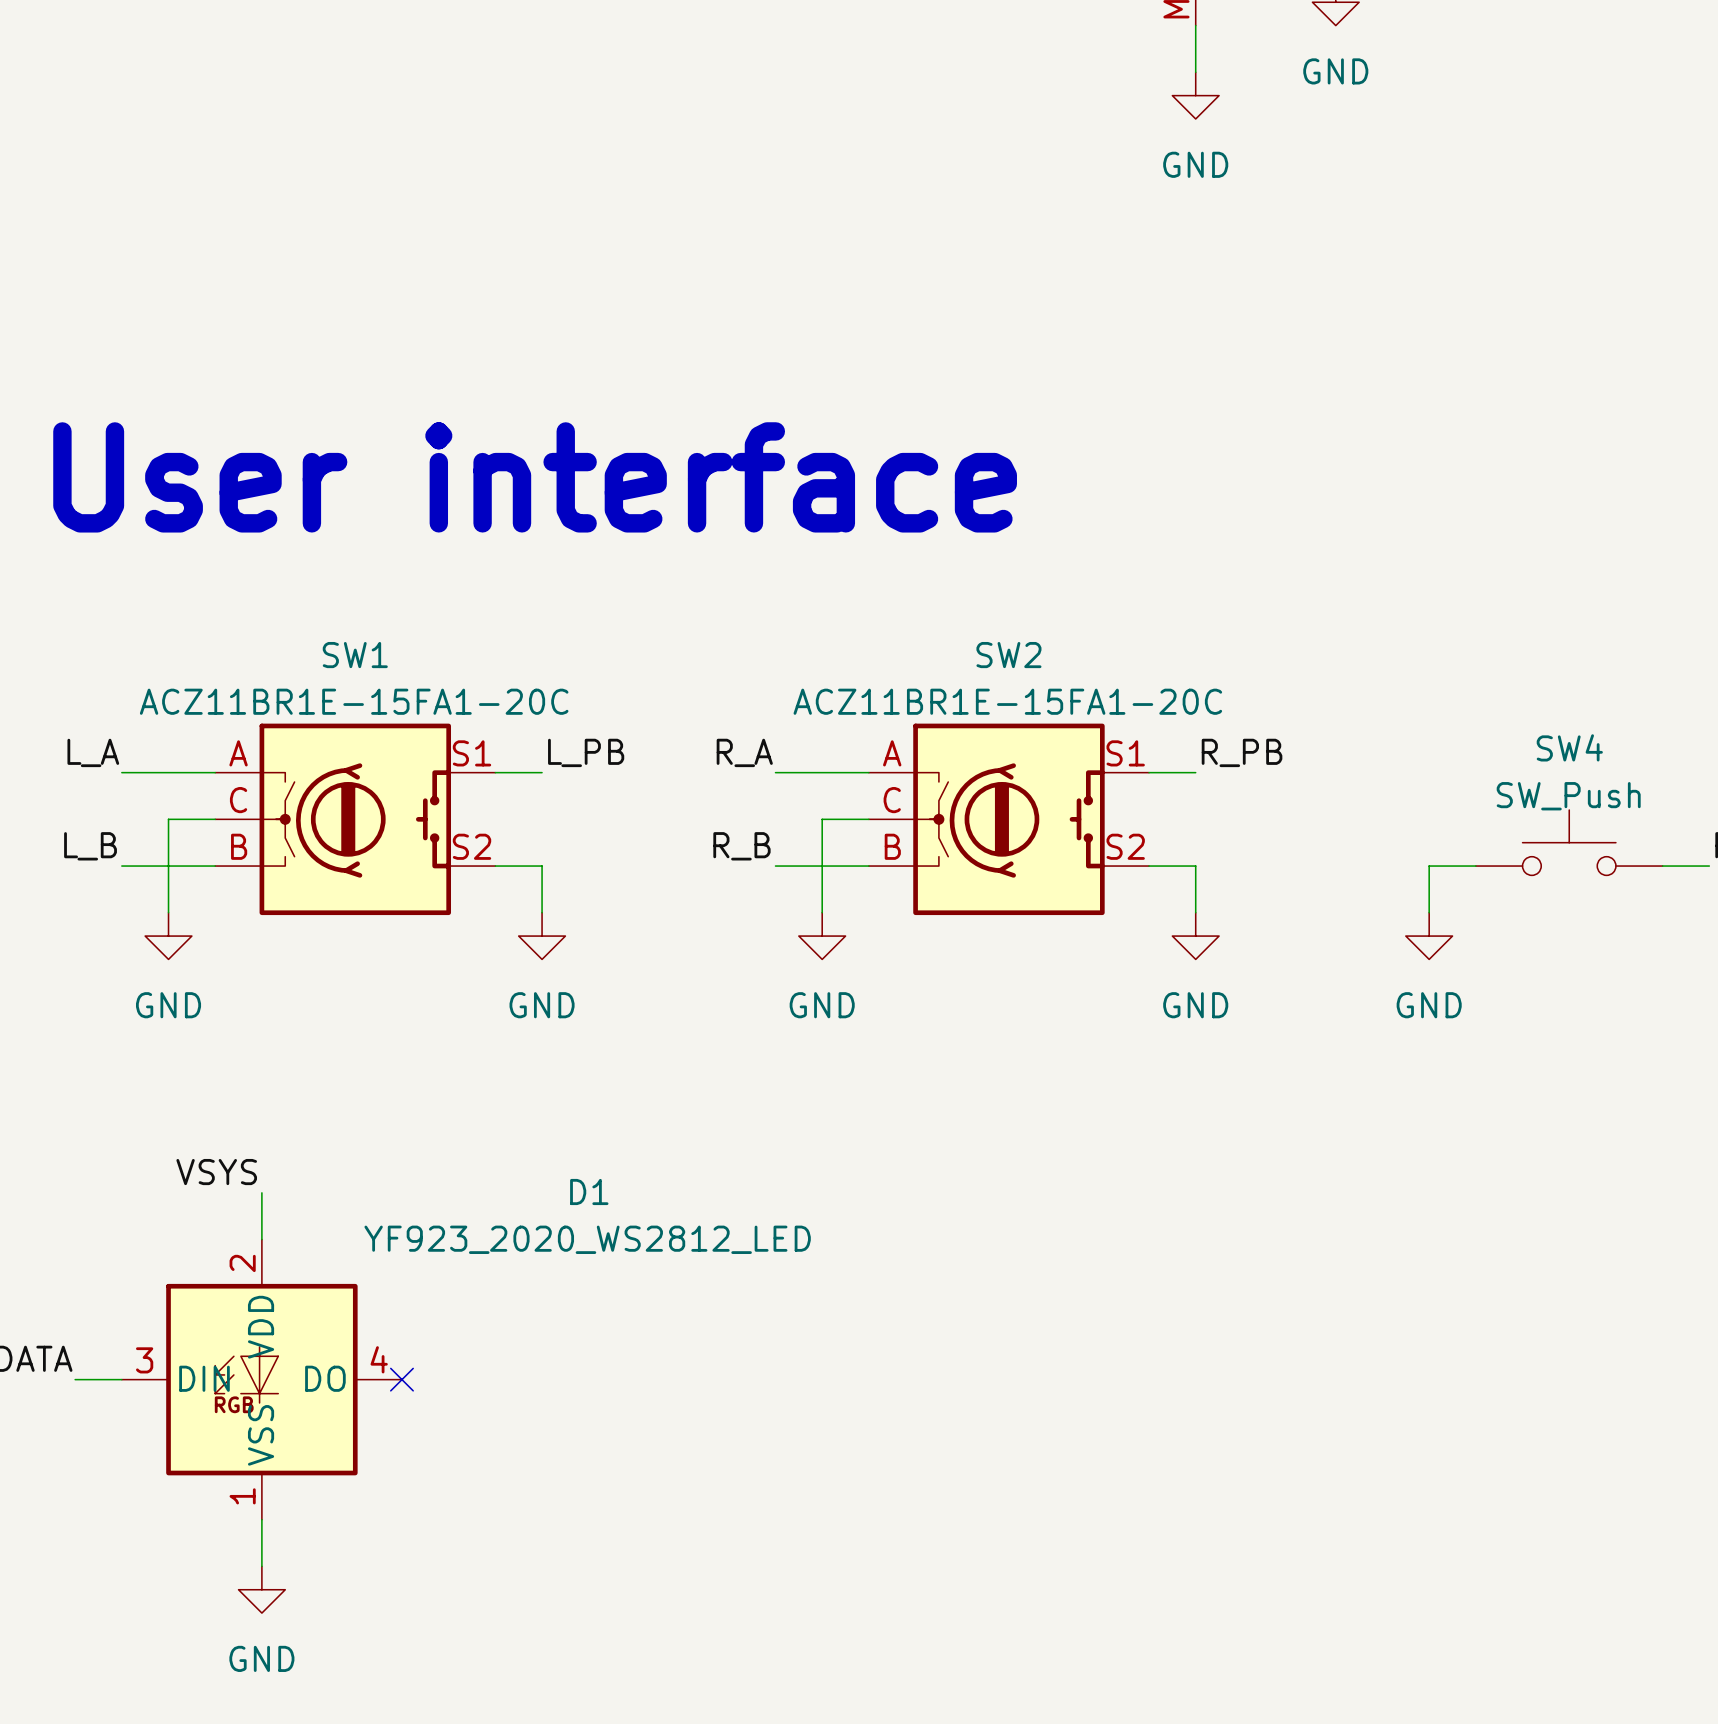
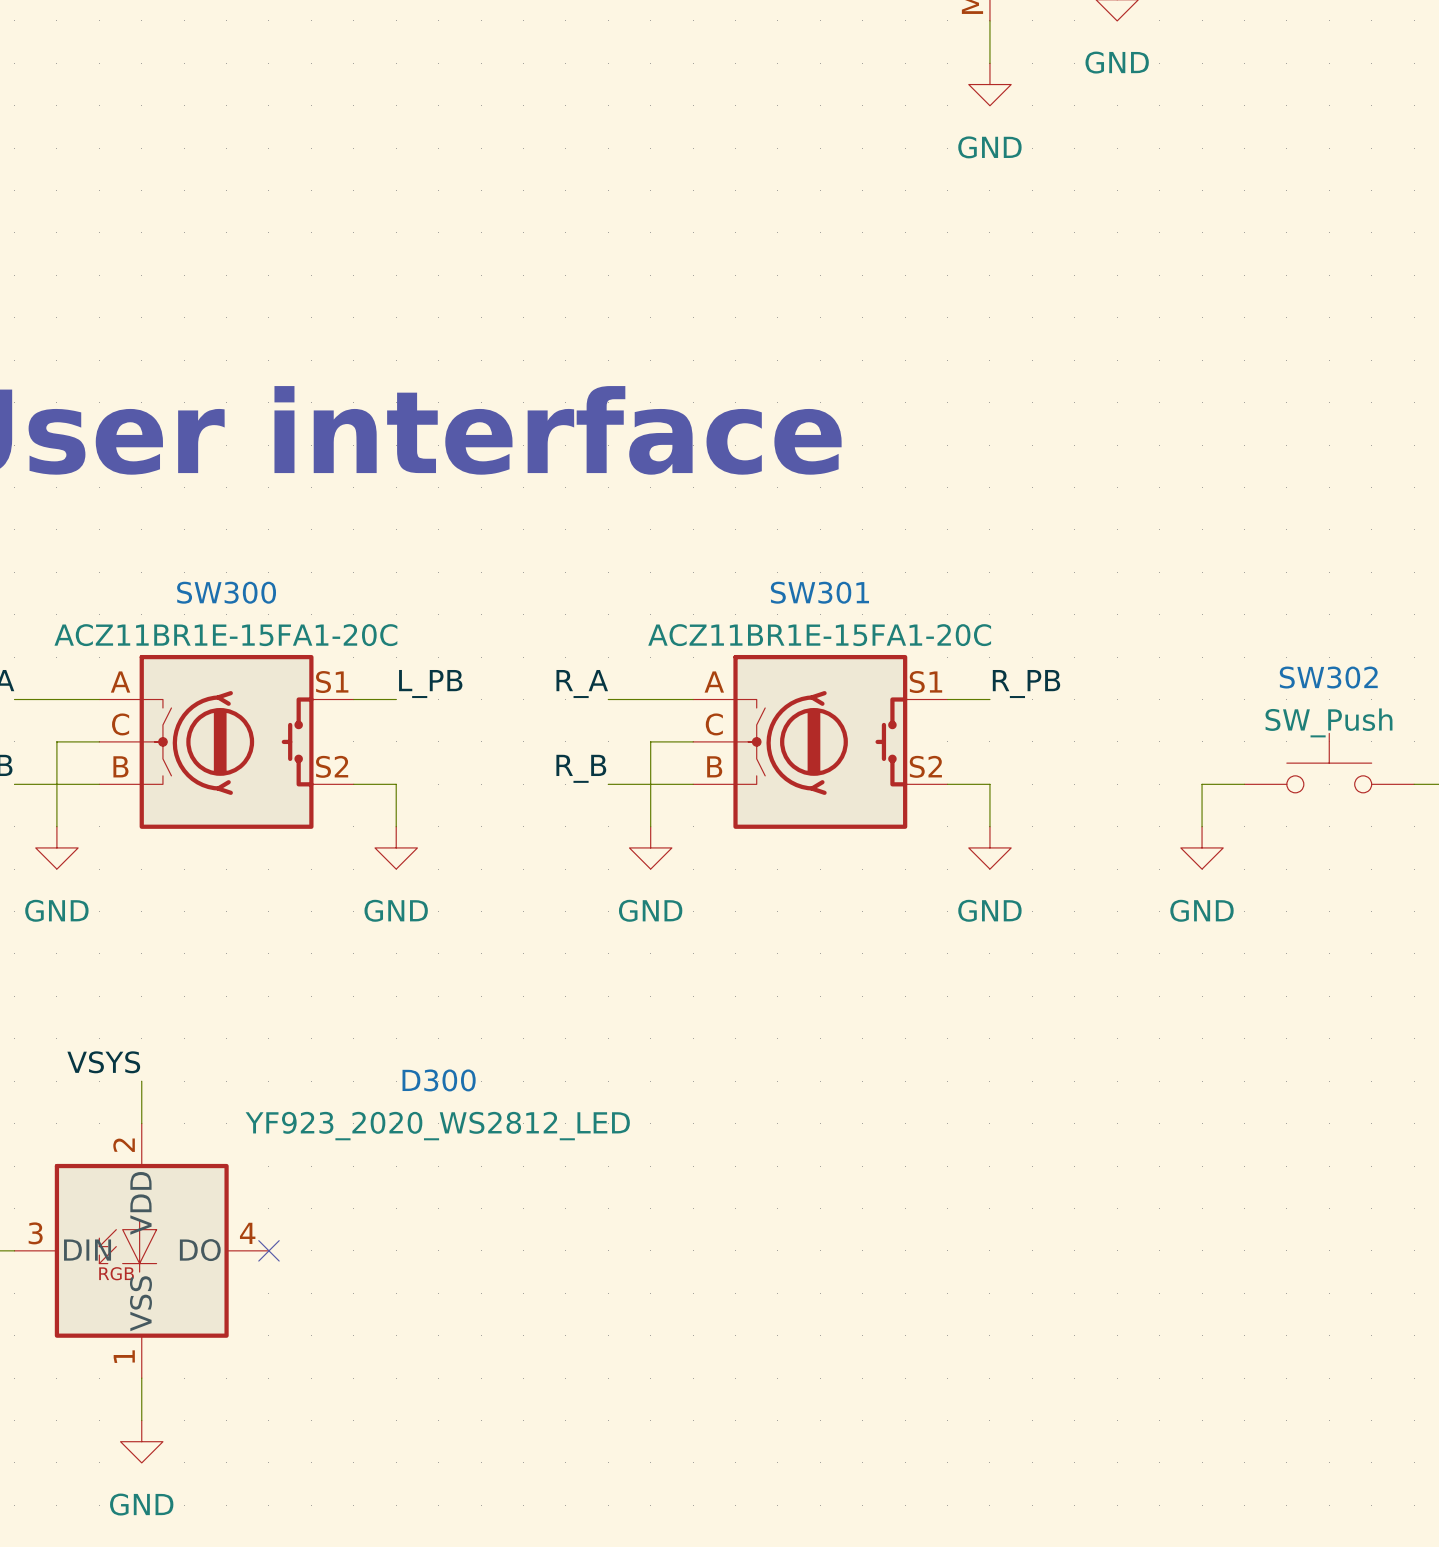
SW1 name: SW1 (355, 655) -> SW300 (226, 592)
SW2 name: SW2 (1008, 655) -> SW301 (819, 592)
SW4 name: SW4 (1569, 747) -> SW302 (1328, 677)
D1 name: D1 (589, 1191) -> D300 (439, 1080)

